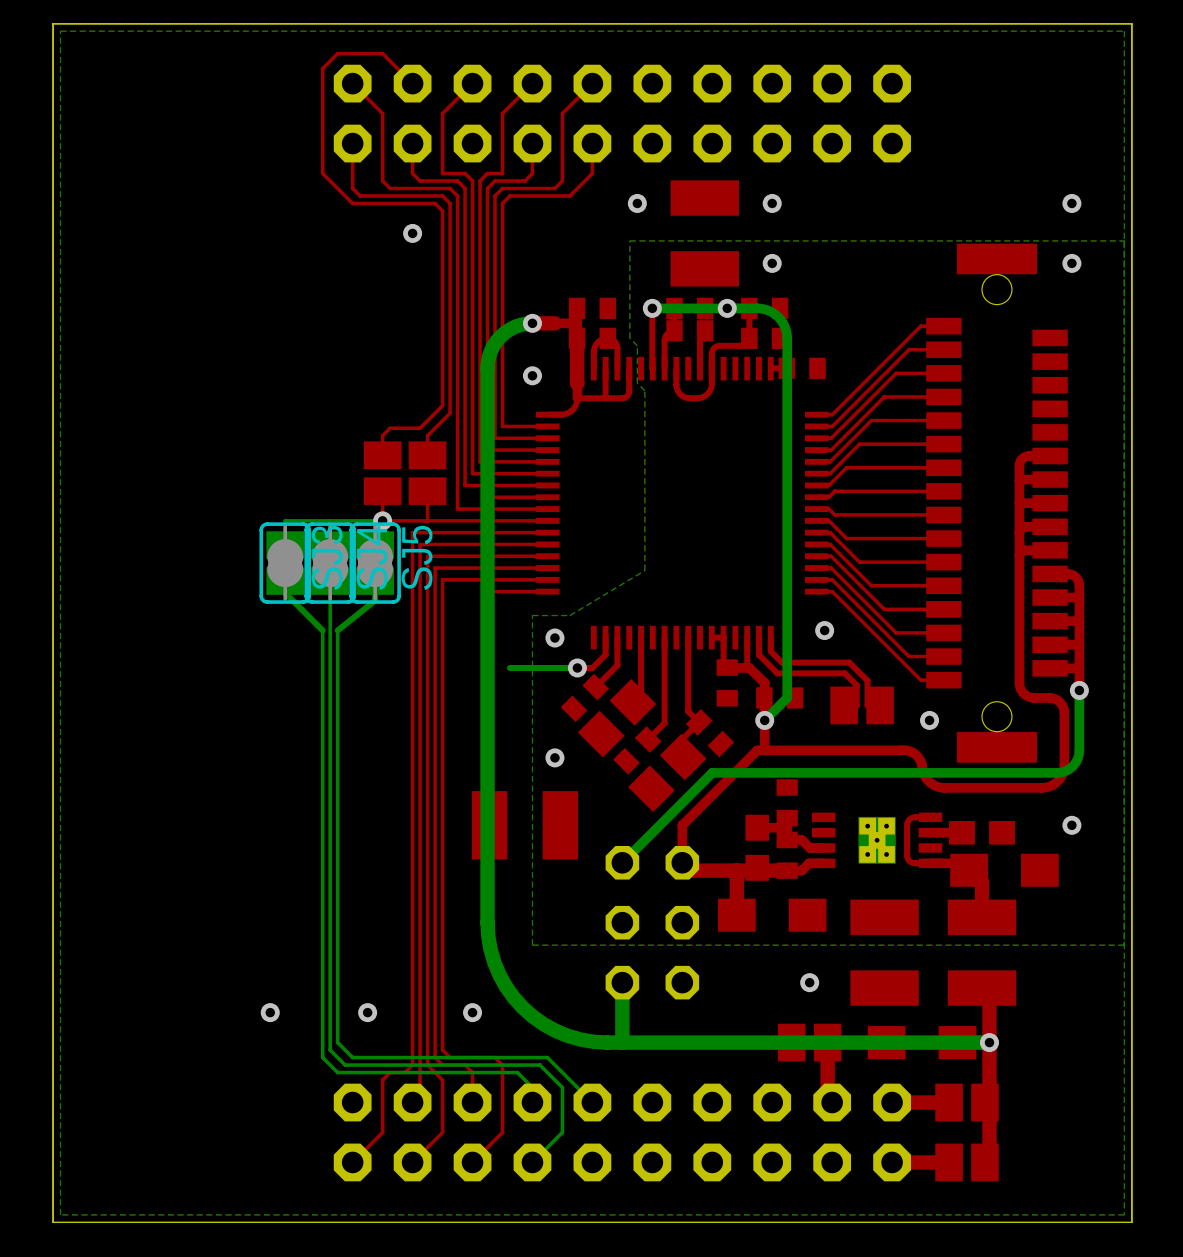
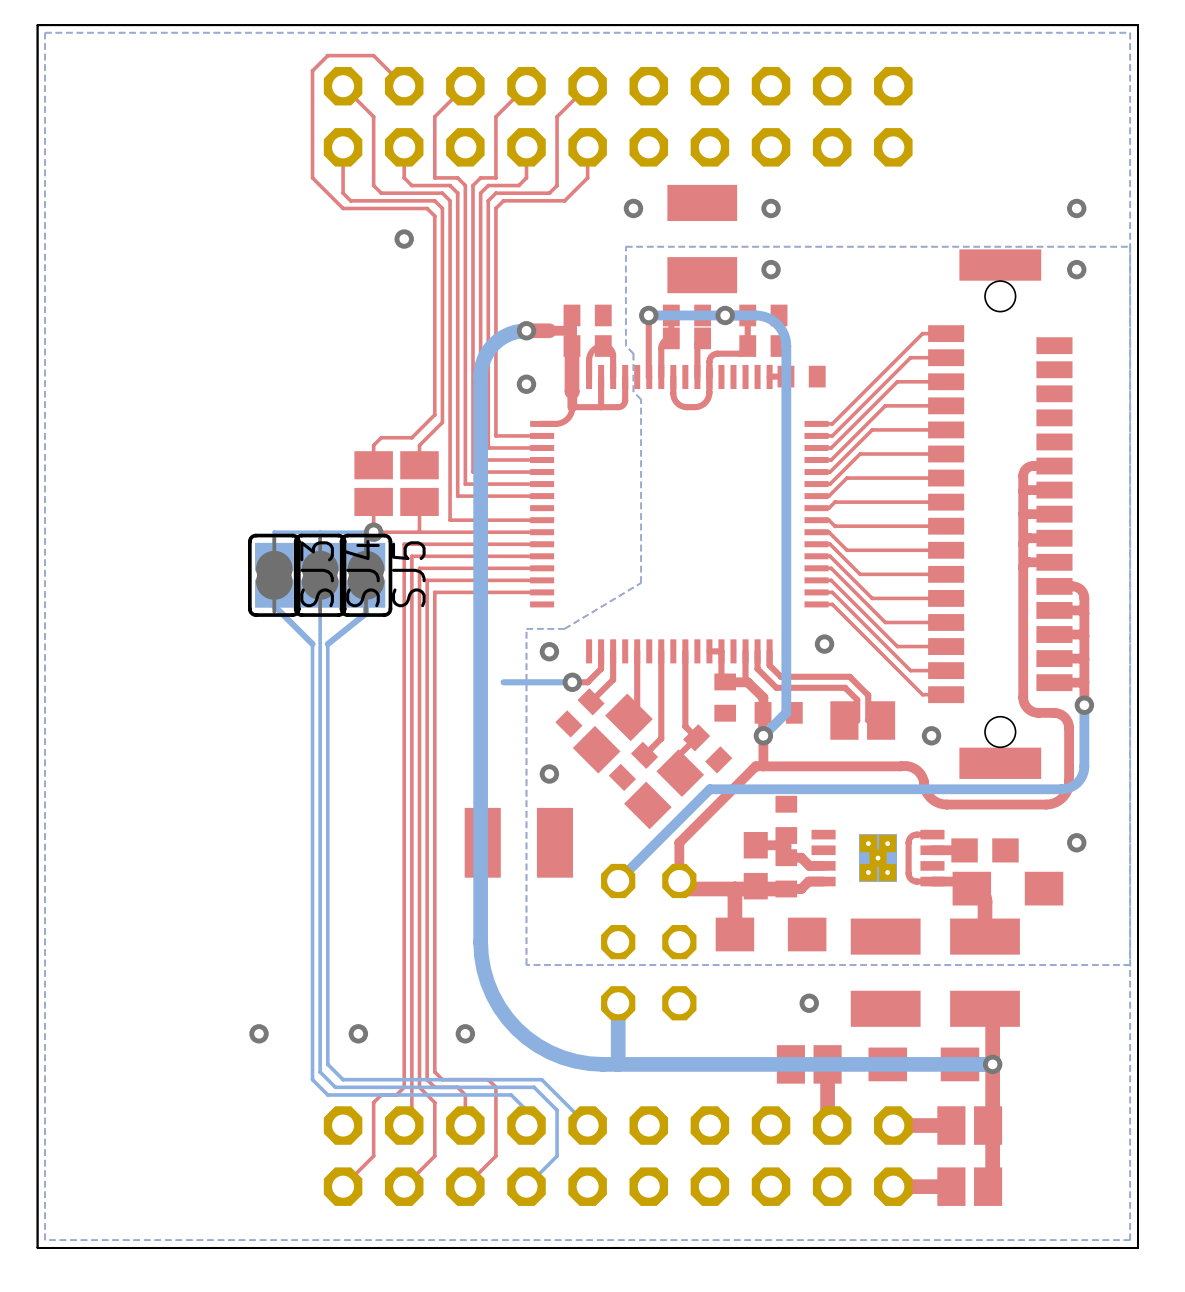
top track: (487, 495) (489, 497) (547, 497) -> none
top track: (547, 591) (487, 593) -> none

